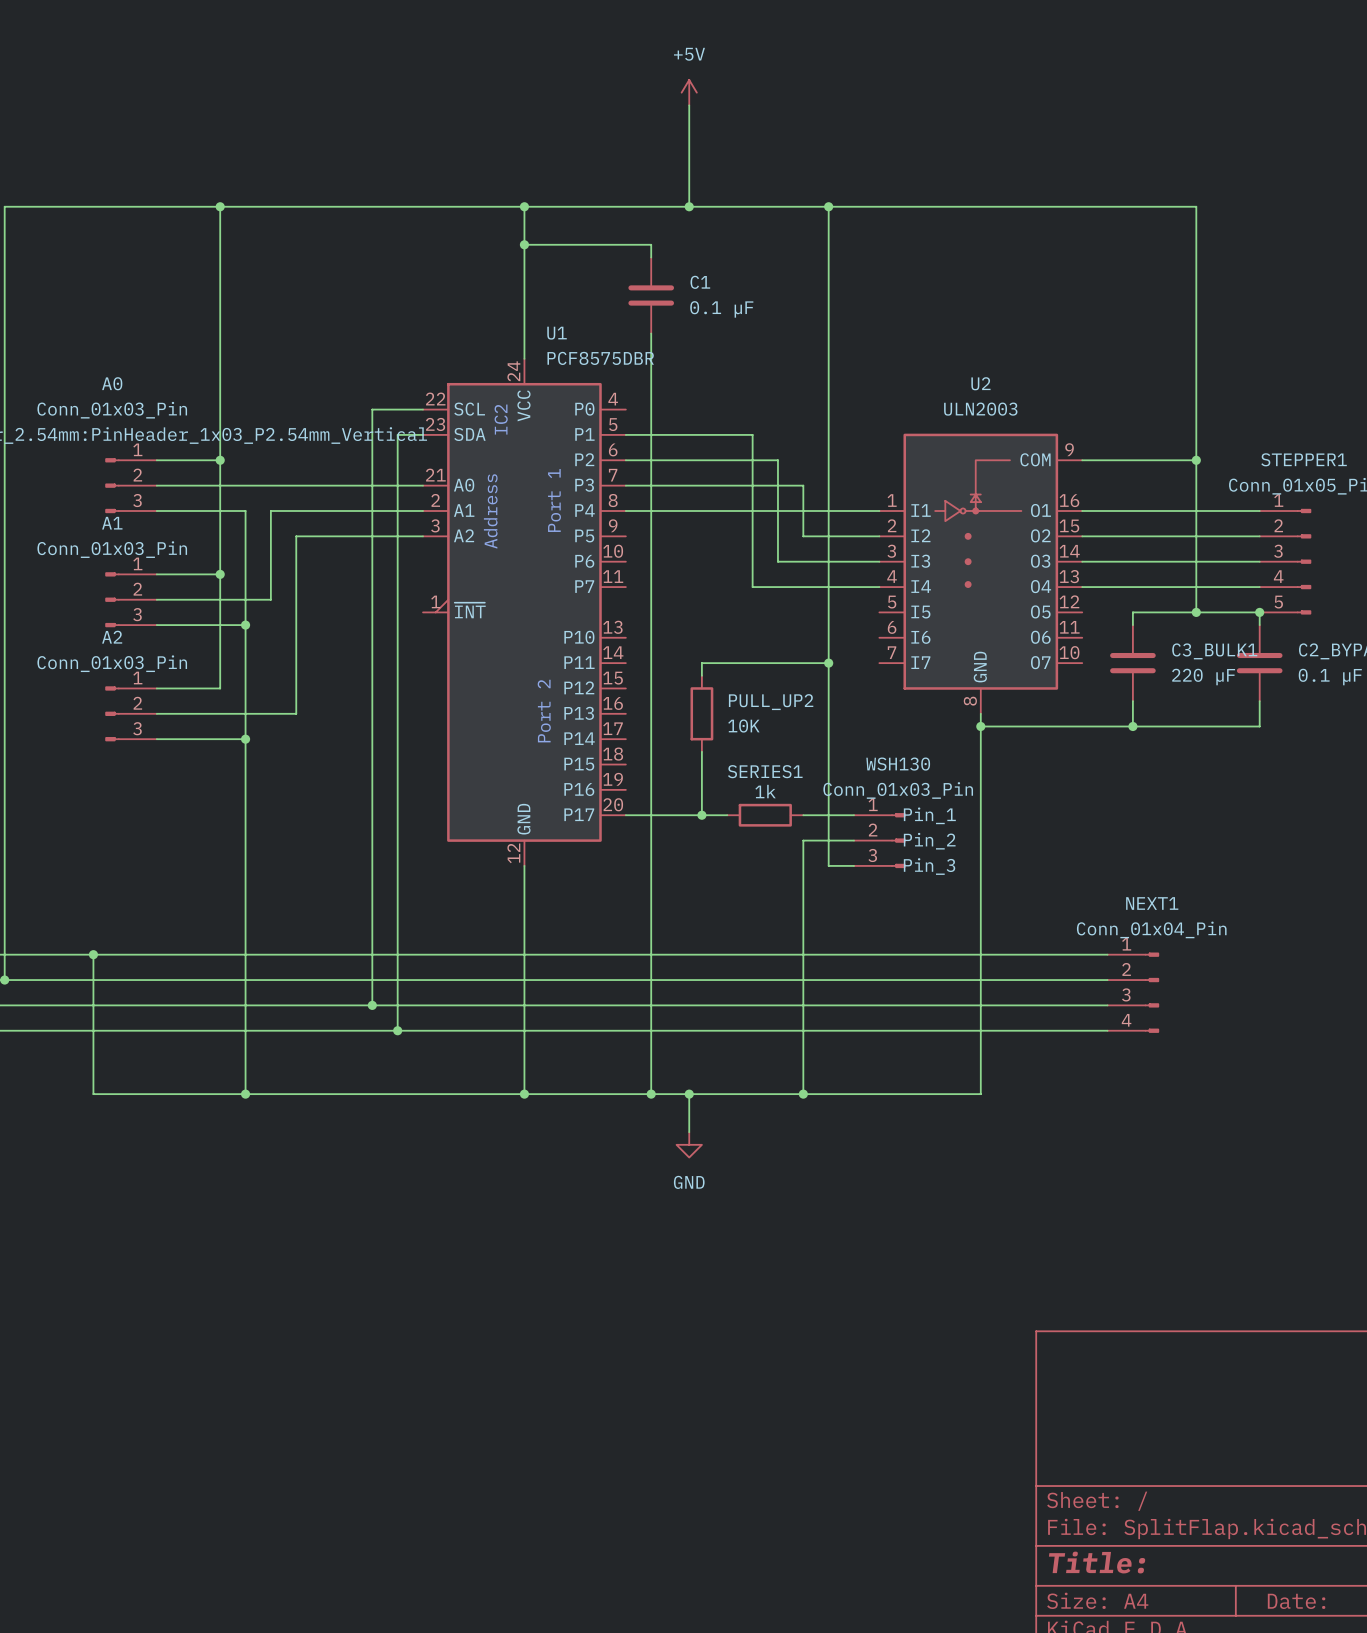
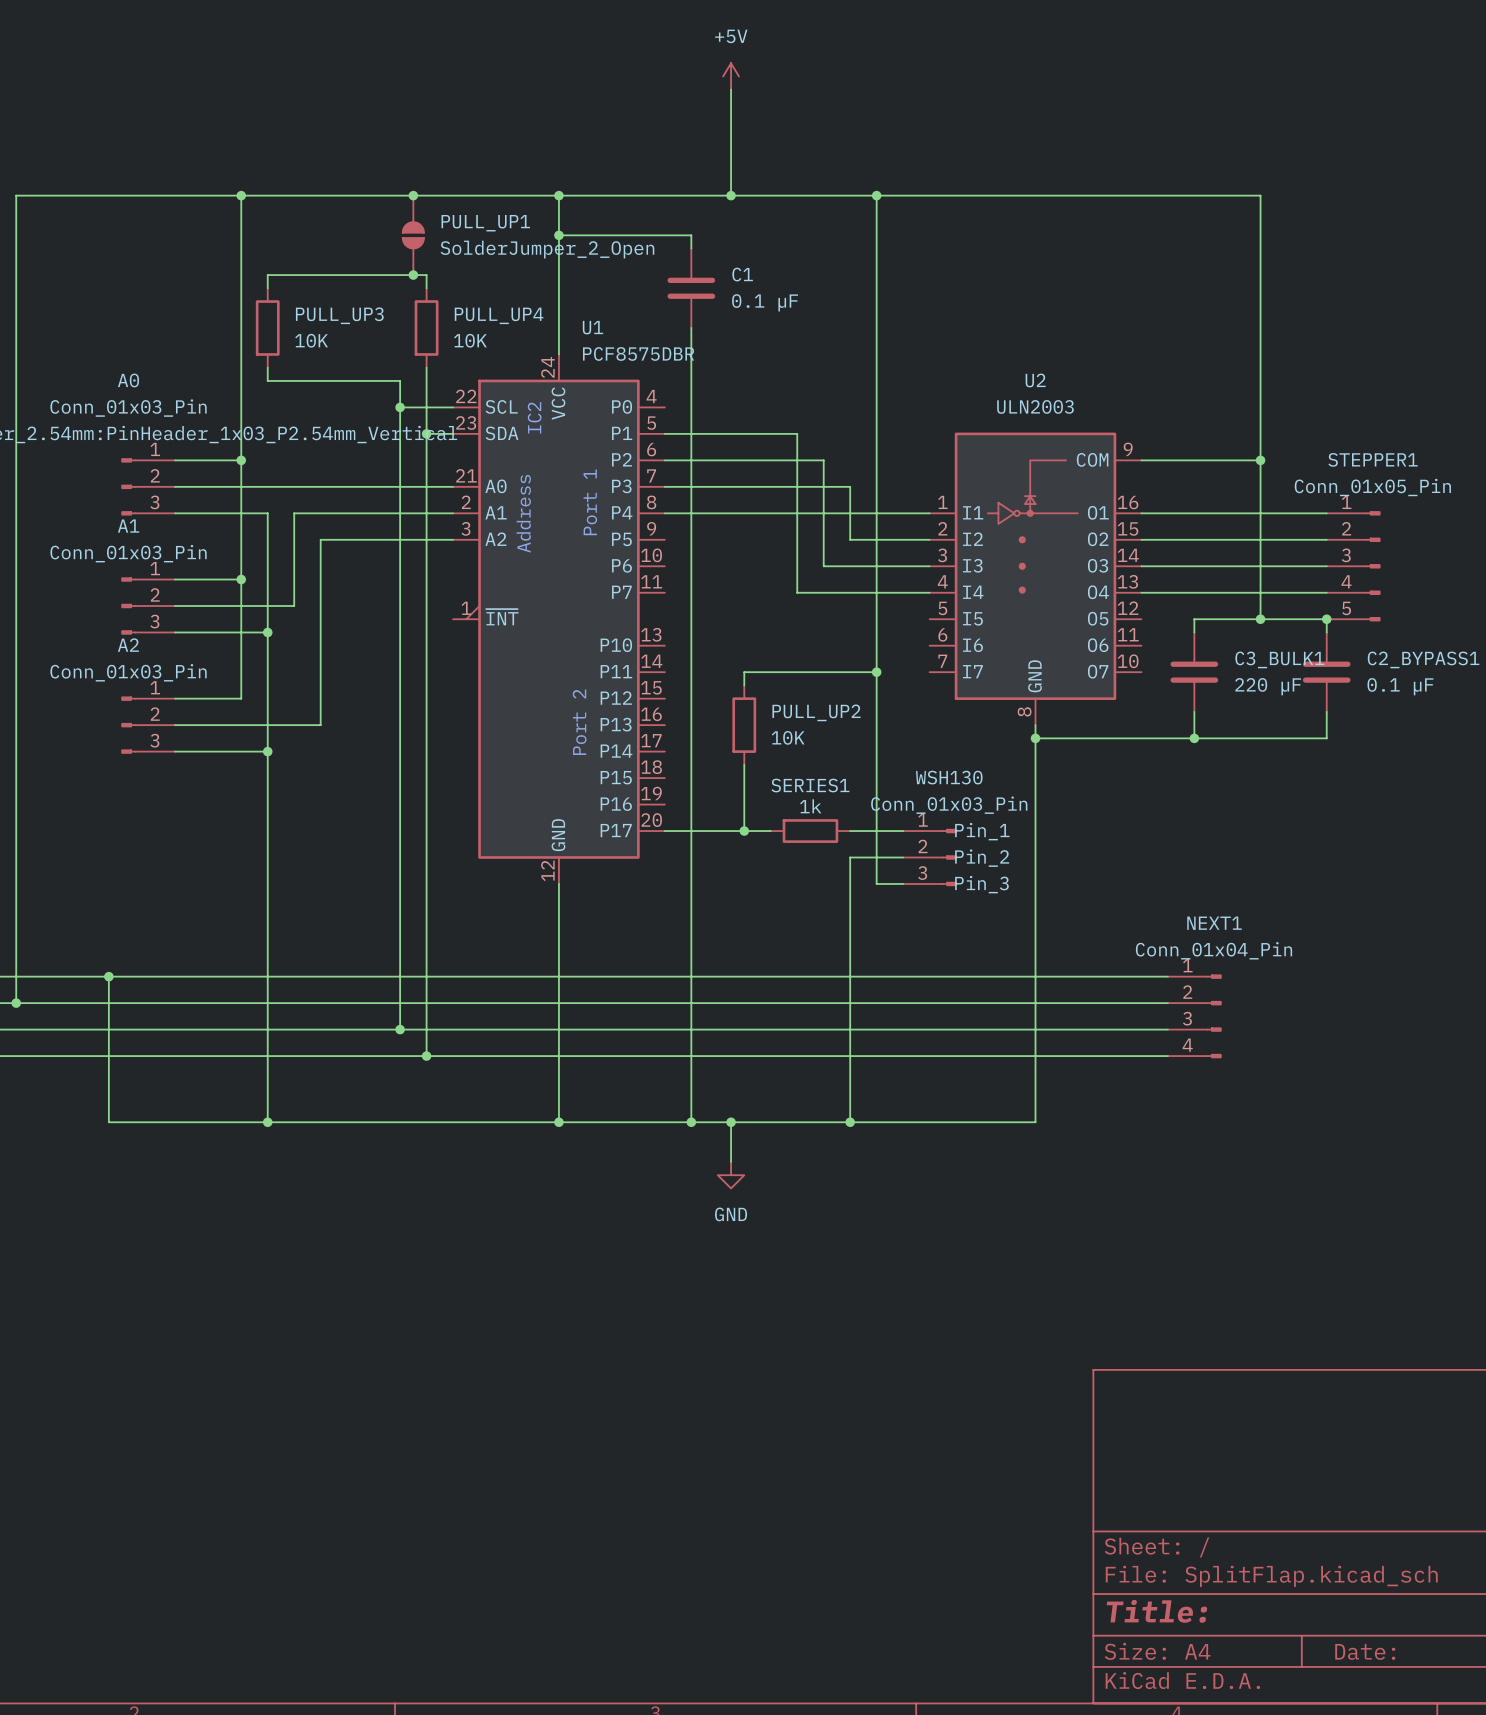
junction: none -> (413, 195)
PULL_UP1: none -> SolderJumper_2_Open (413, 235)
junction: none -> (413, 275)
wire: none -> (267, 288) (267, 275) (426, 275) (426, 288)
PULL_UP3: none -> 10K (267, 328)
PULL_UP4: none -> 10K (426, 328)
wire: none -> (267, 367) (267, 380) (400, 380) (400, 407)
wire: none -> (426, 367) (426, 433)
junction: none -> (400, 407)
junction: none -> (426, 433)

